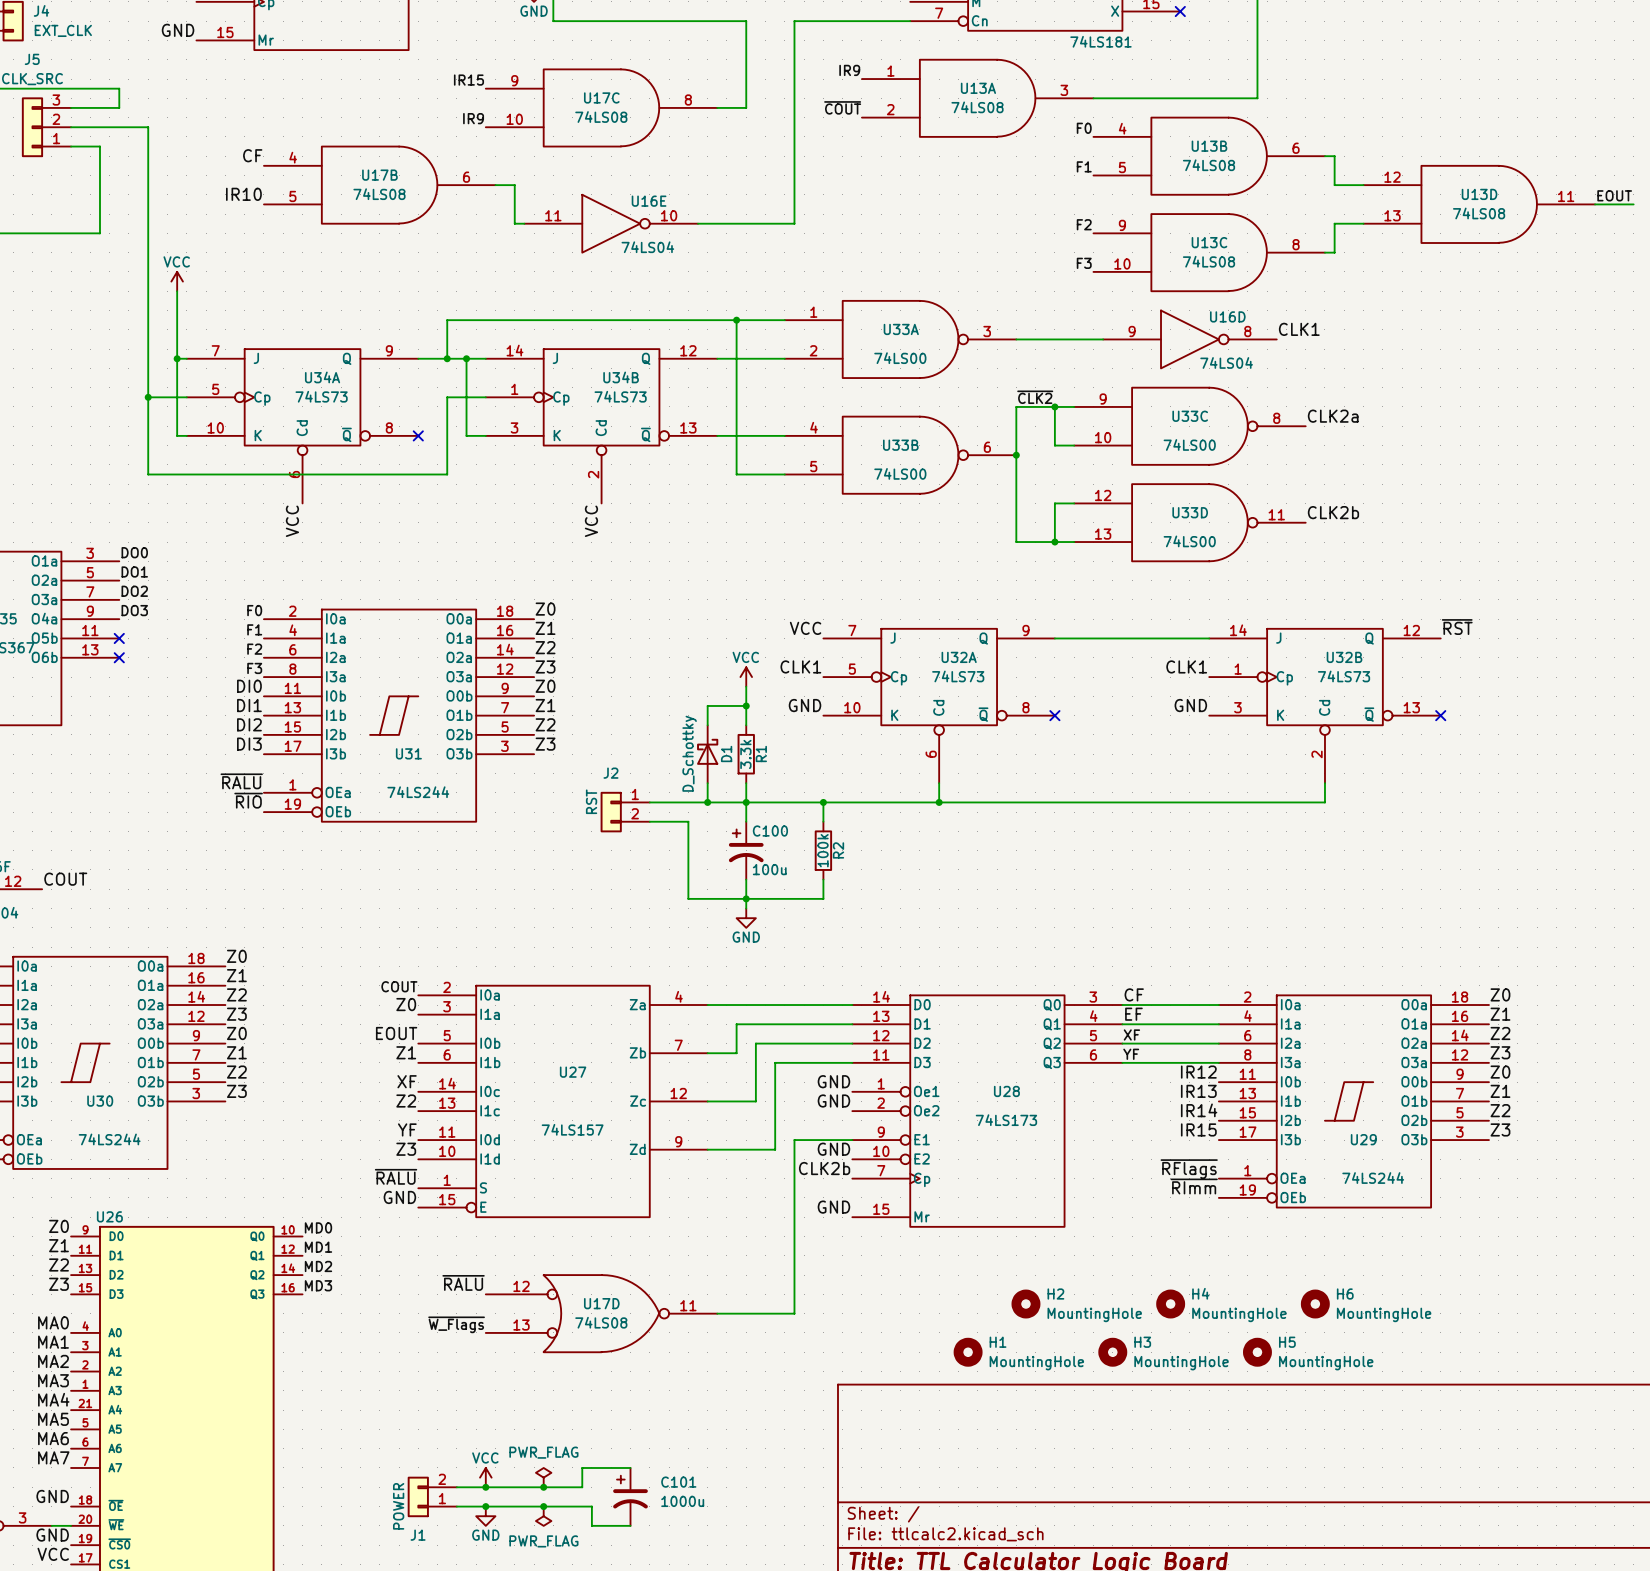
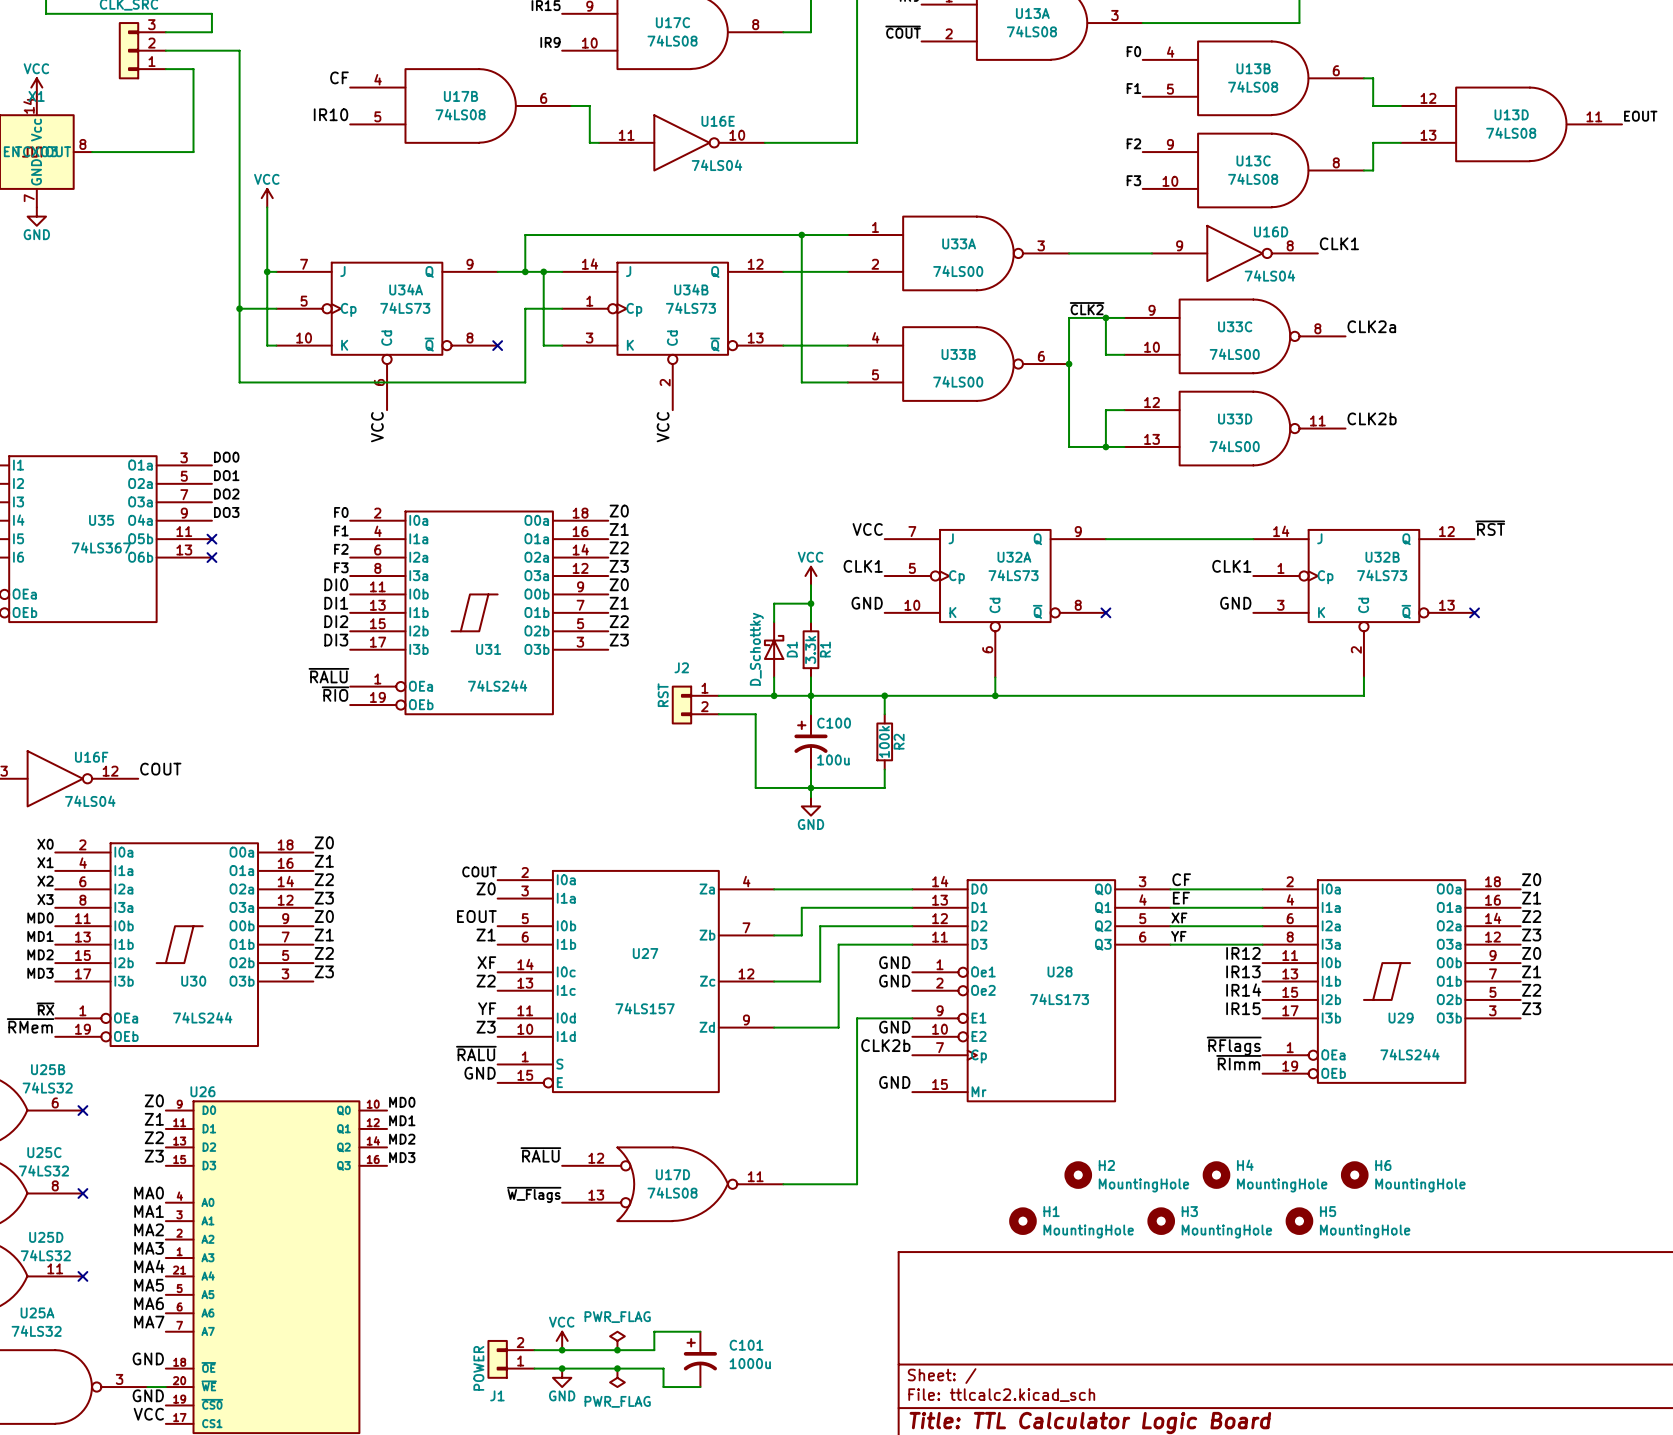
wire: (1595, 204) (1633, 204) -> none

